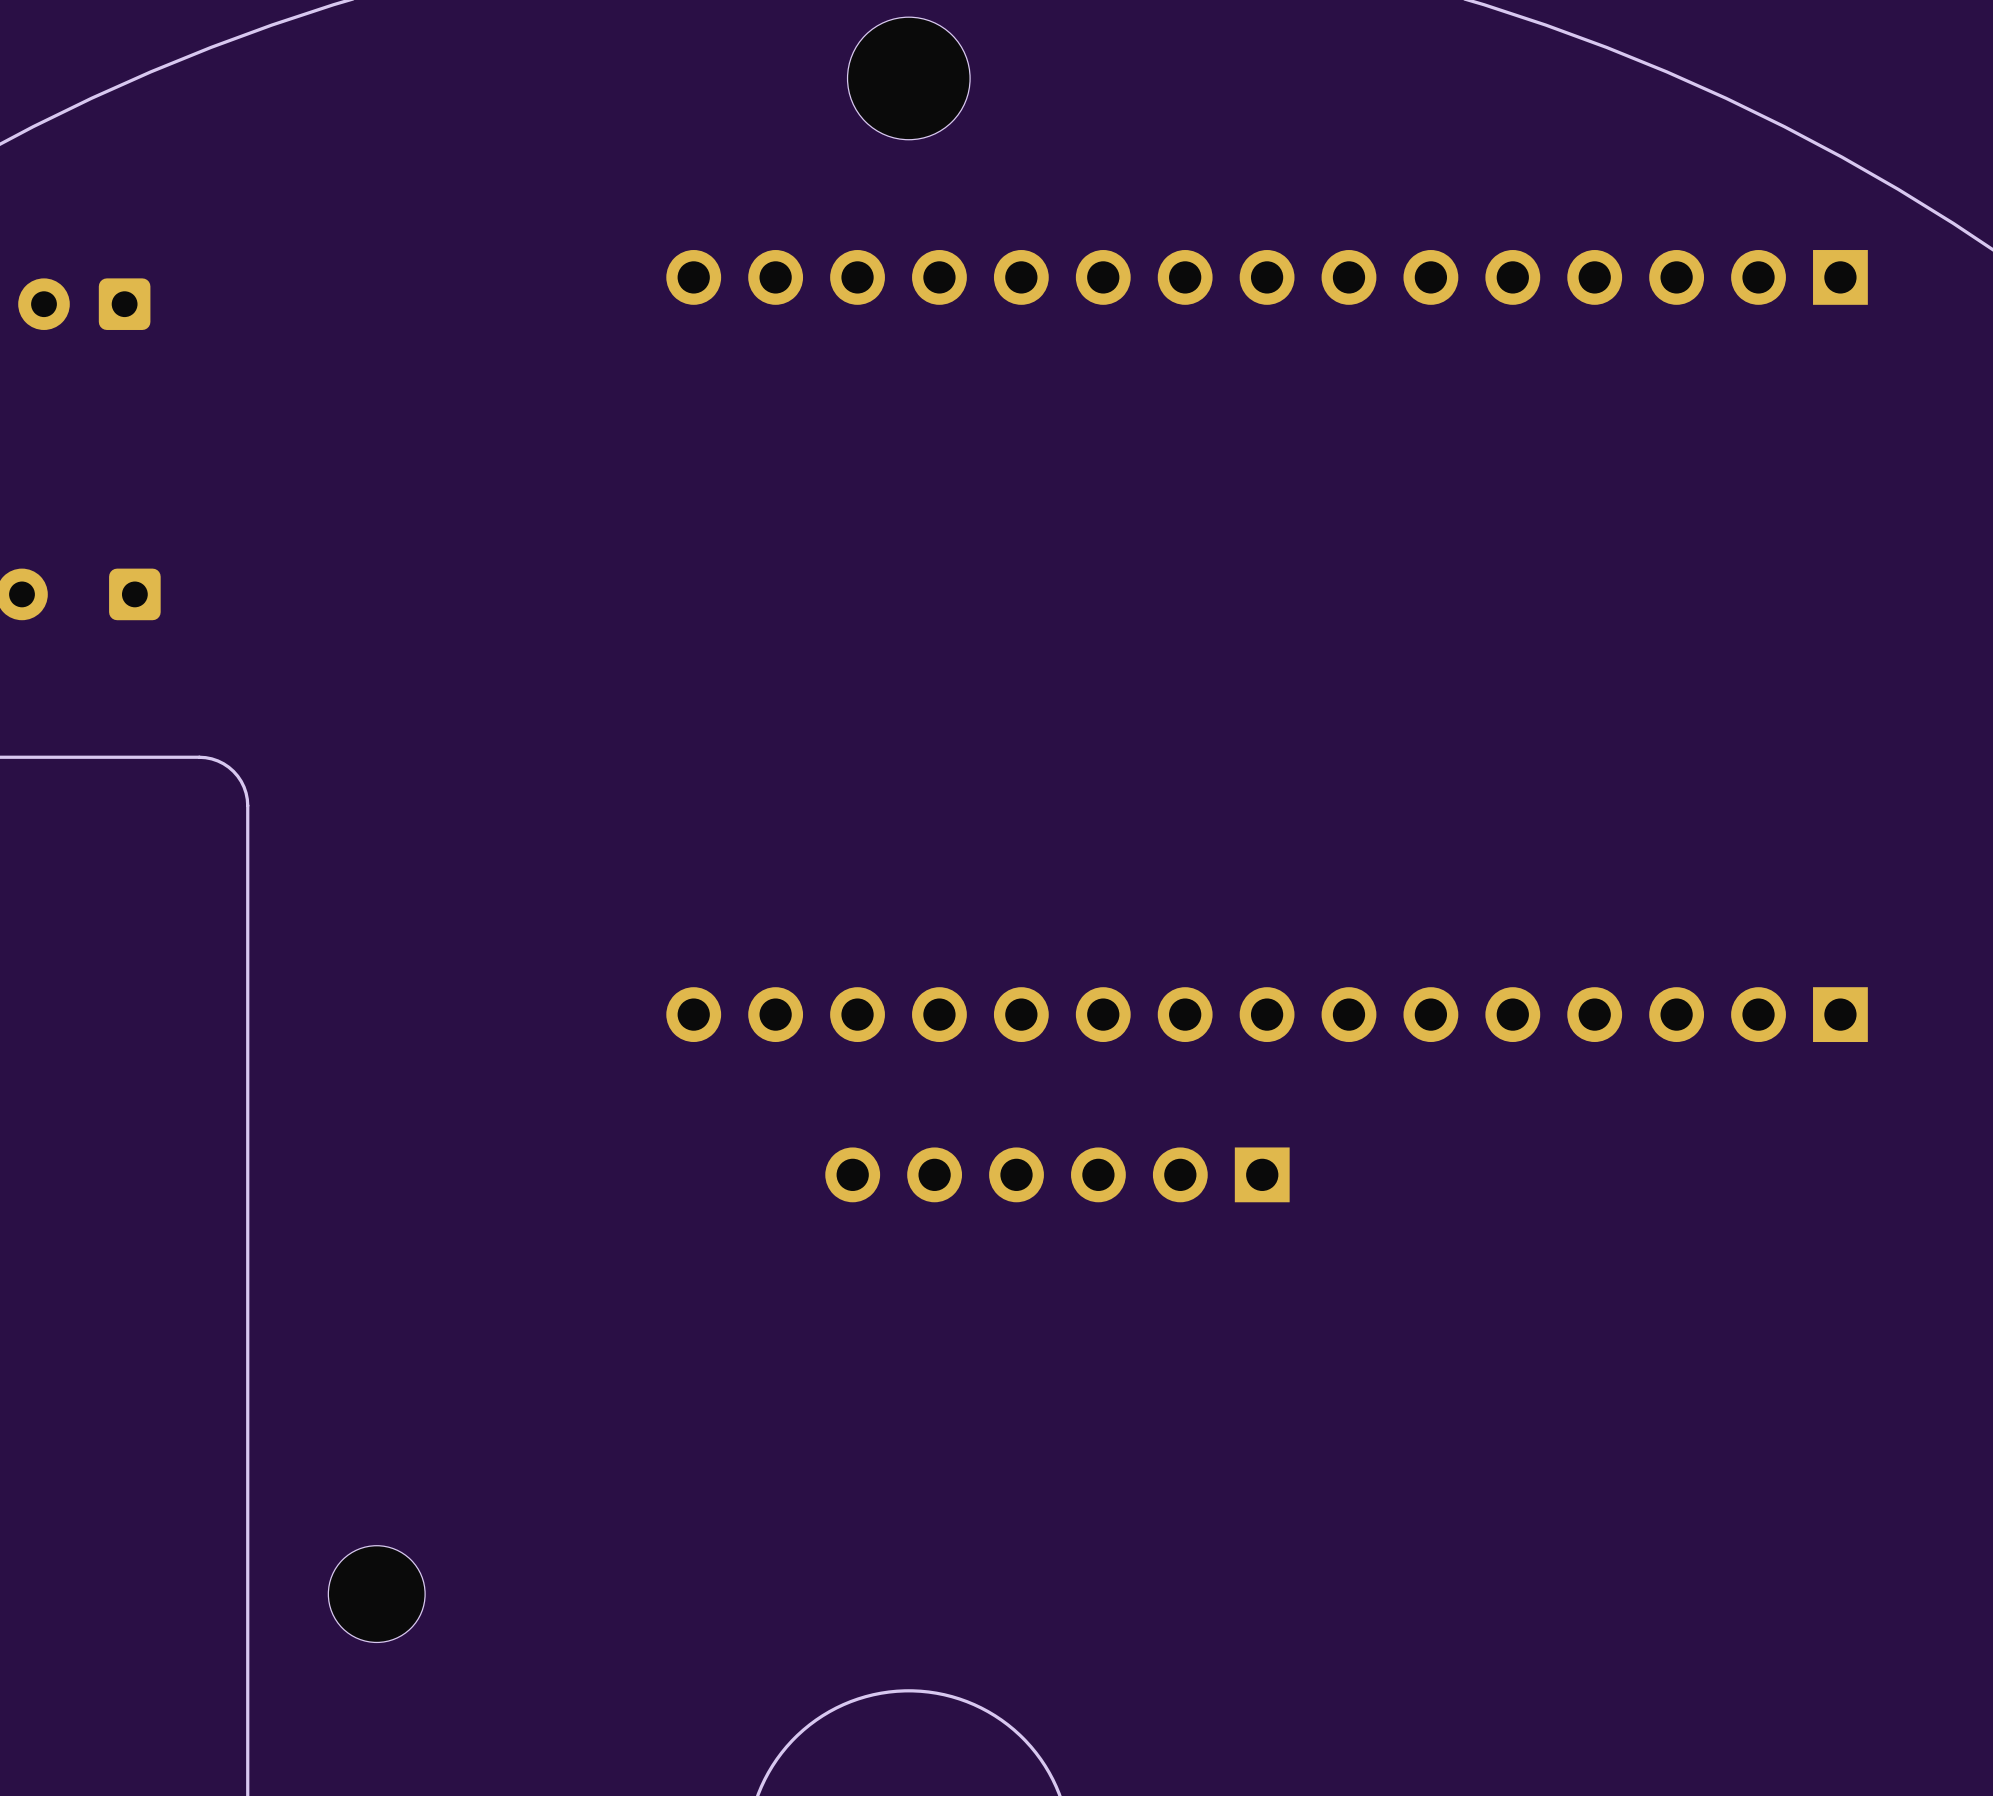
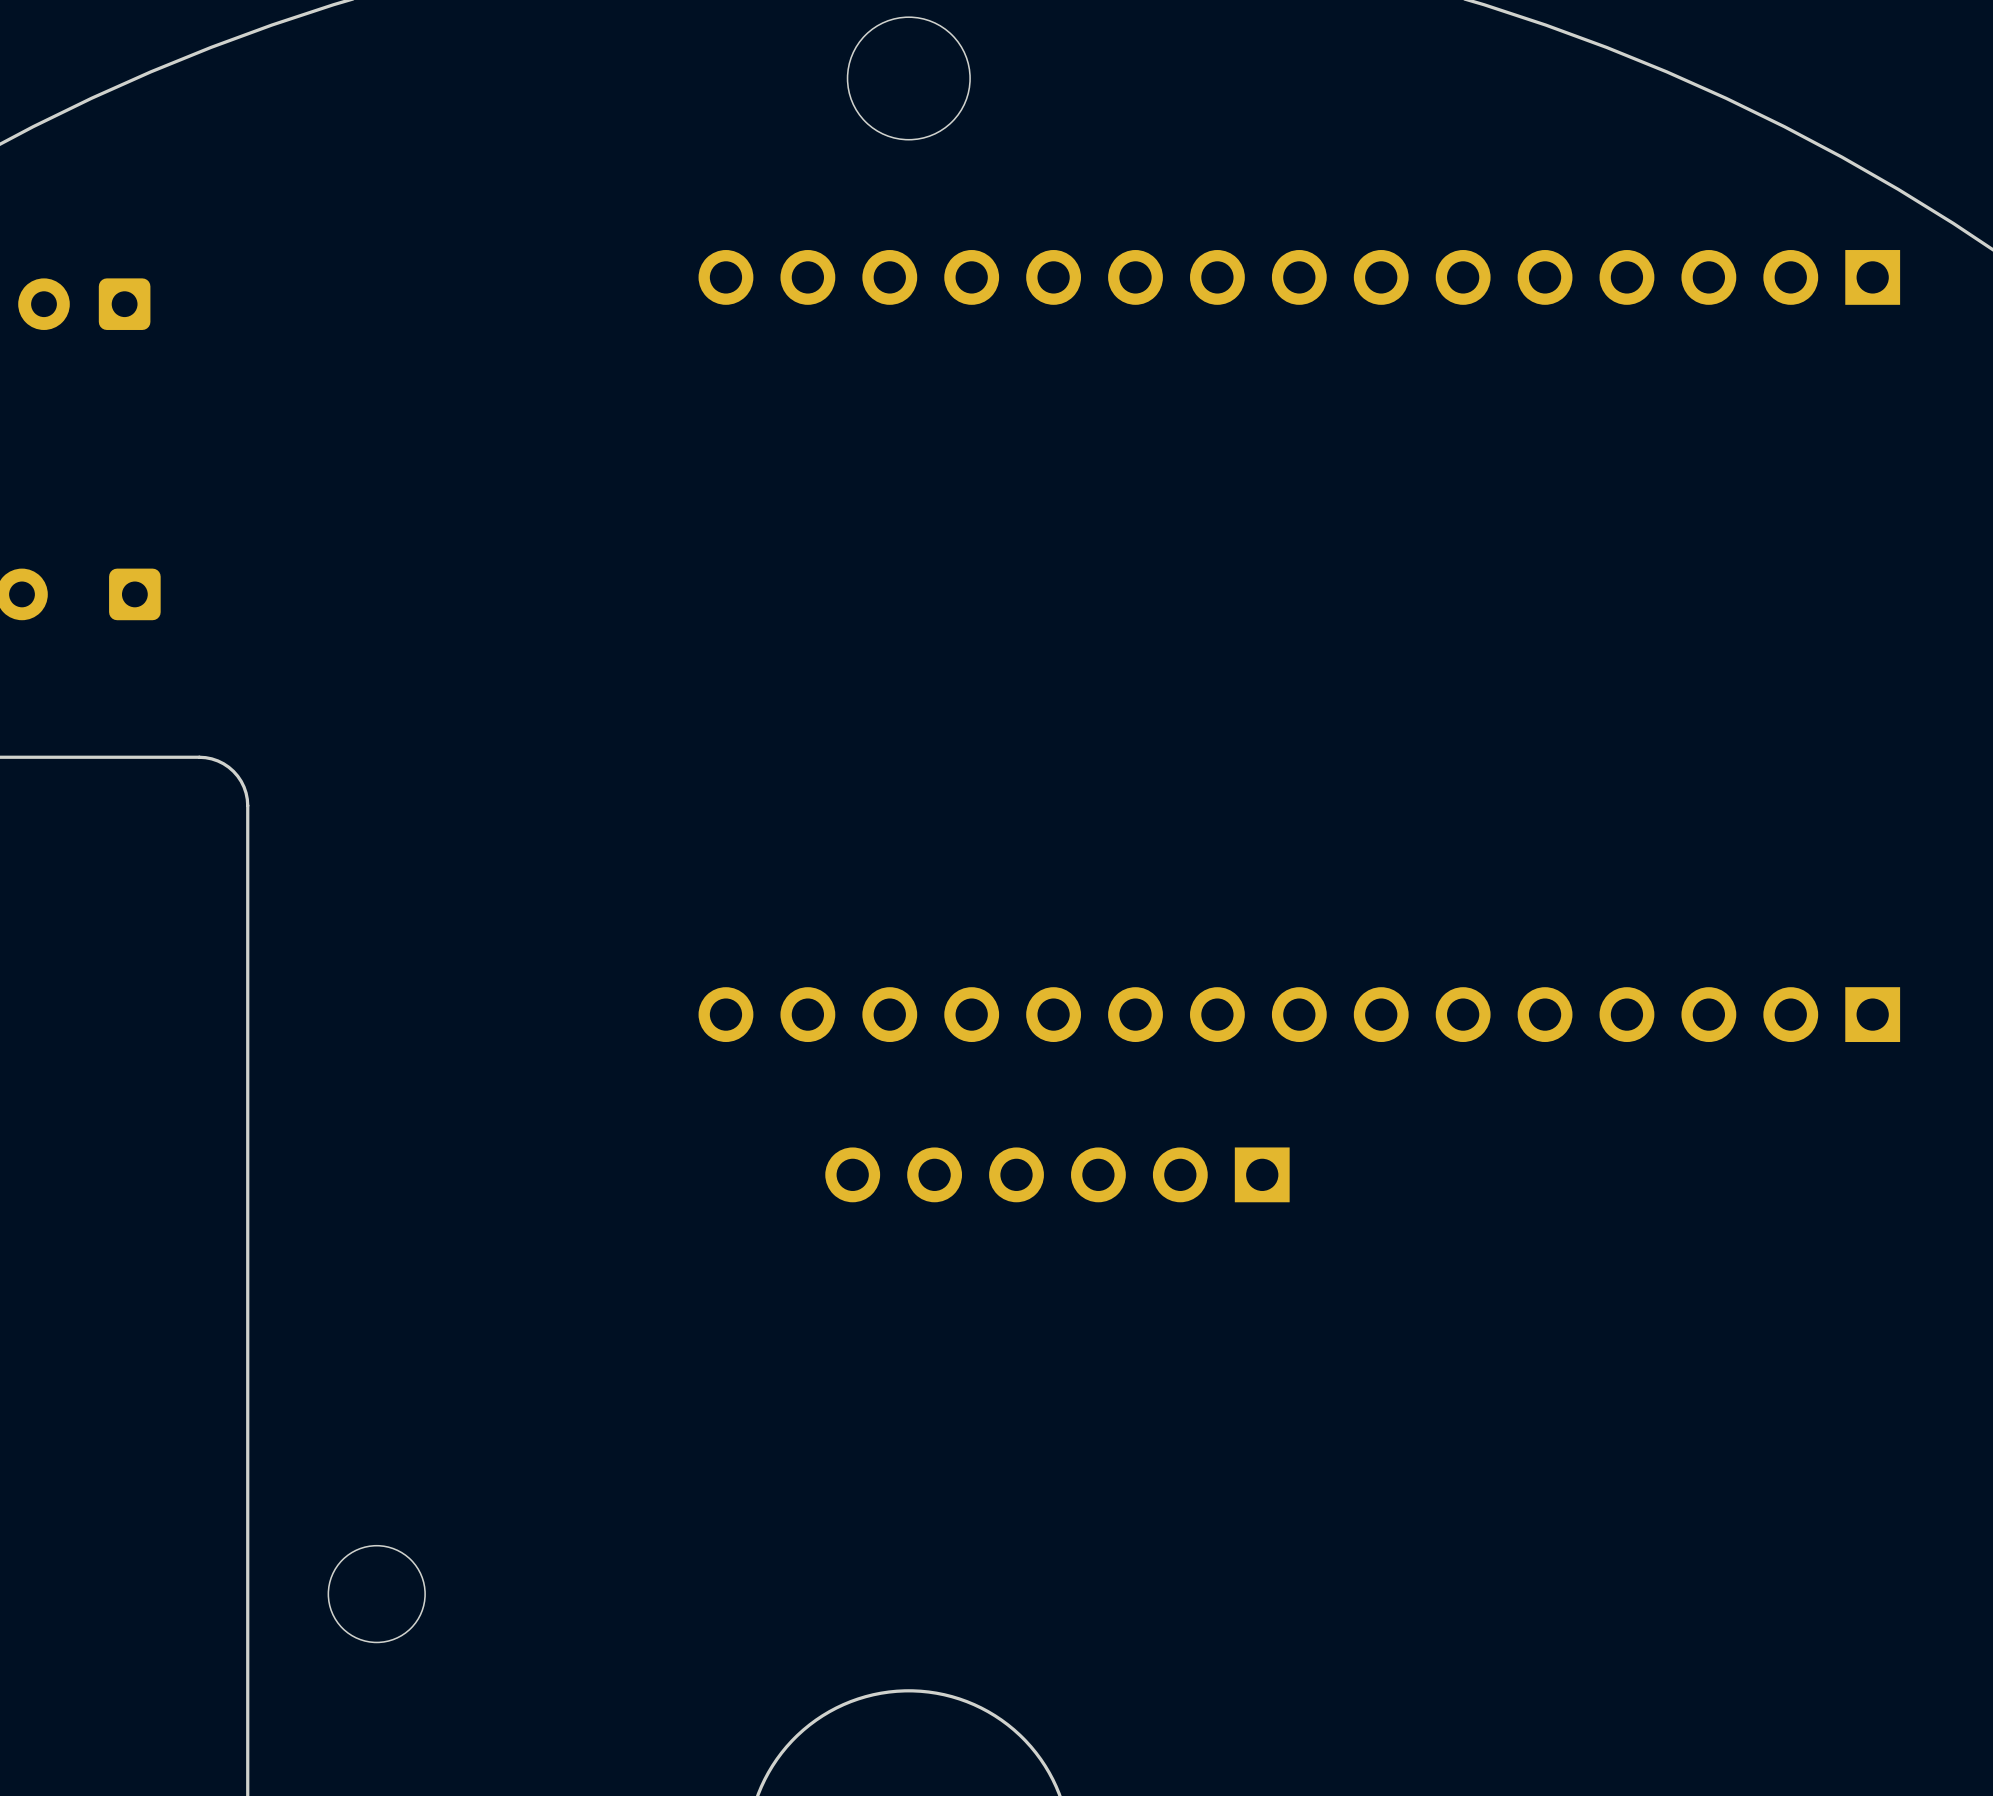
part position: (1267, 277) -> (1299, 277)
part position: (1267, 1014) -> (1299, 1014)

